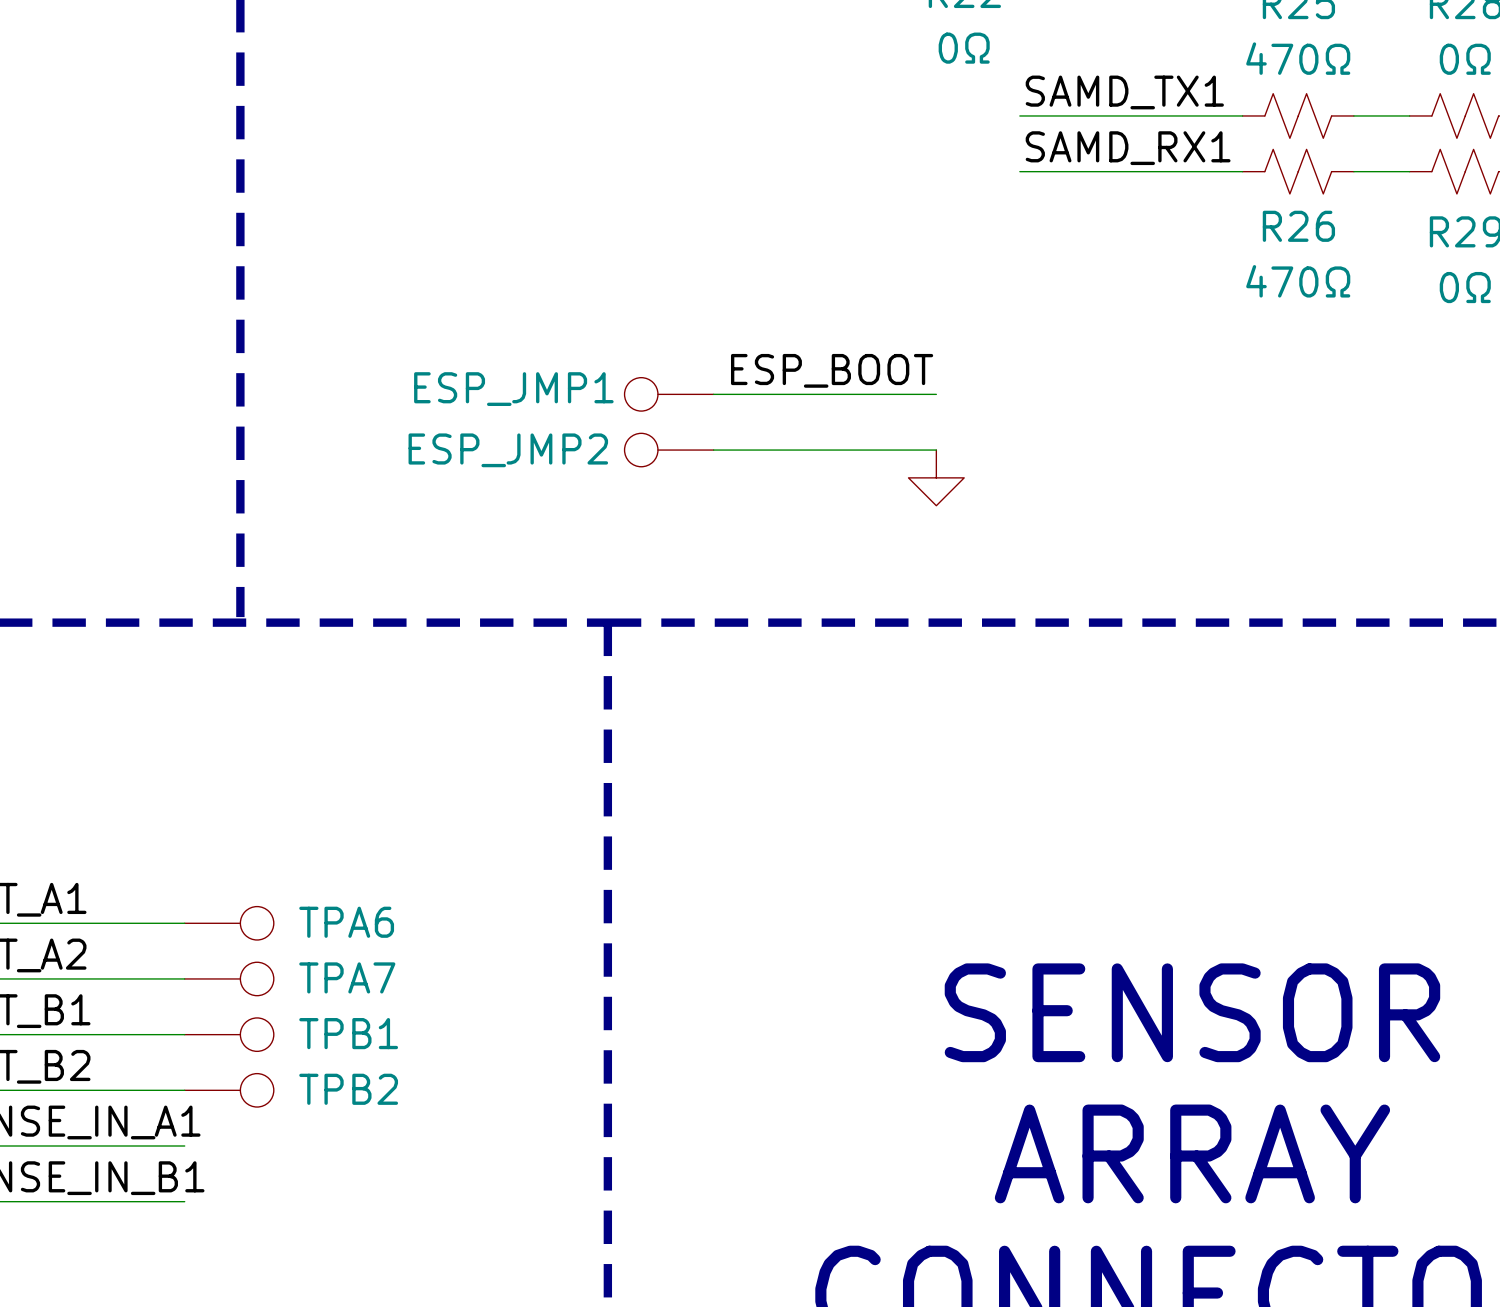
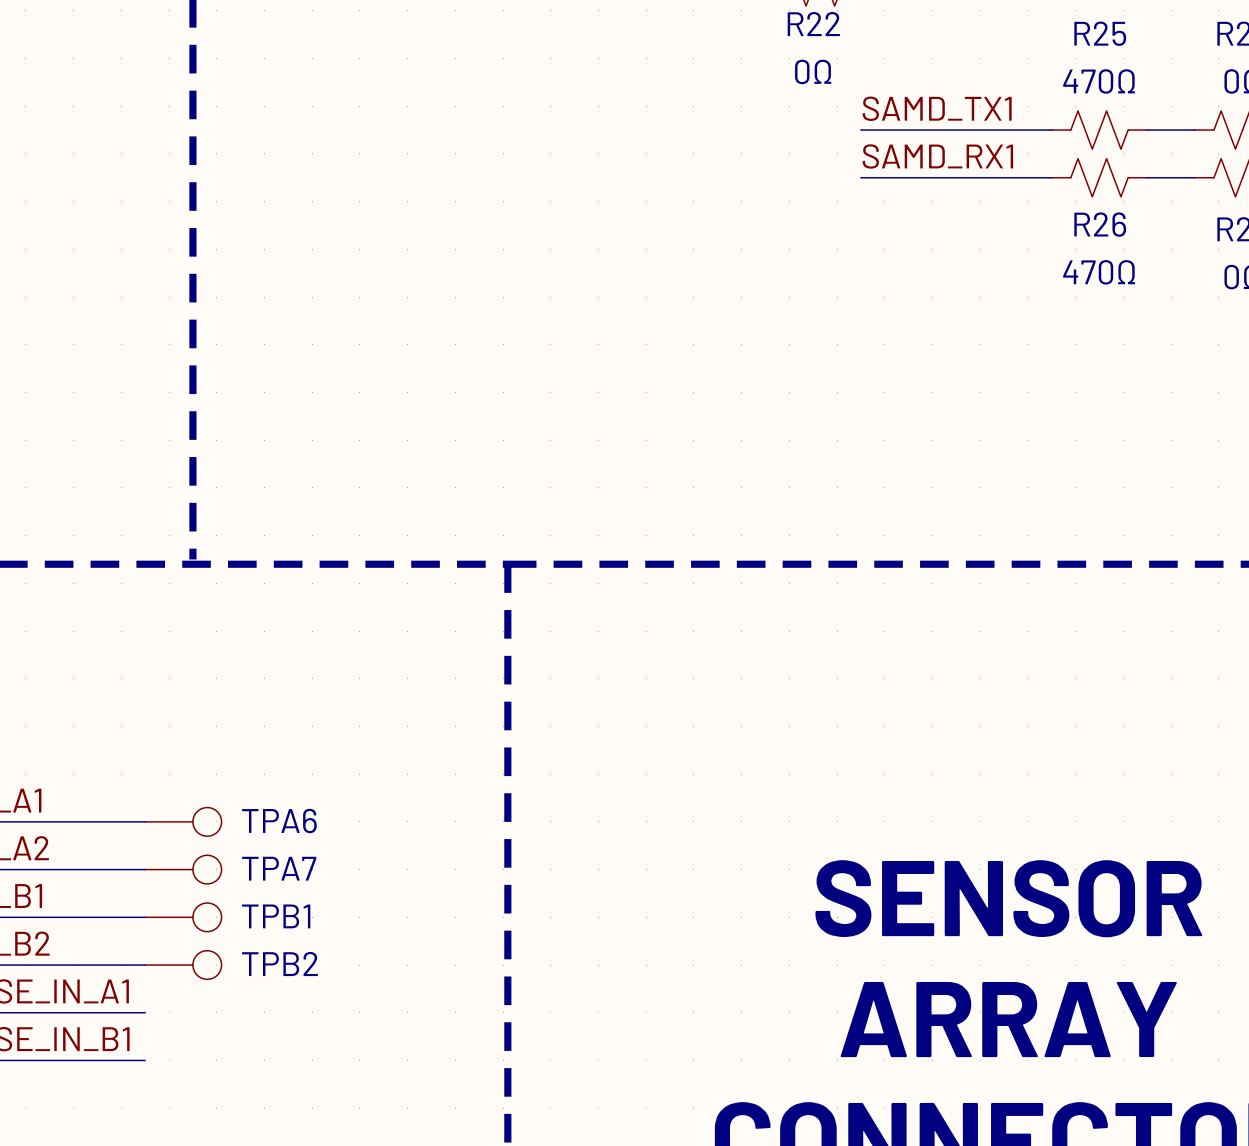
label: ESP_BOOT (832, 370) -> none
ESP_JMP1: (669, 394) -> none
wire: (713, 394) (936, 394) -> none
ESP_JMP2: (669, 450) -> none
wire: (713, 450) (936, 450) -> none
power symbol: (936, 477) -> none

